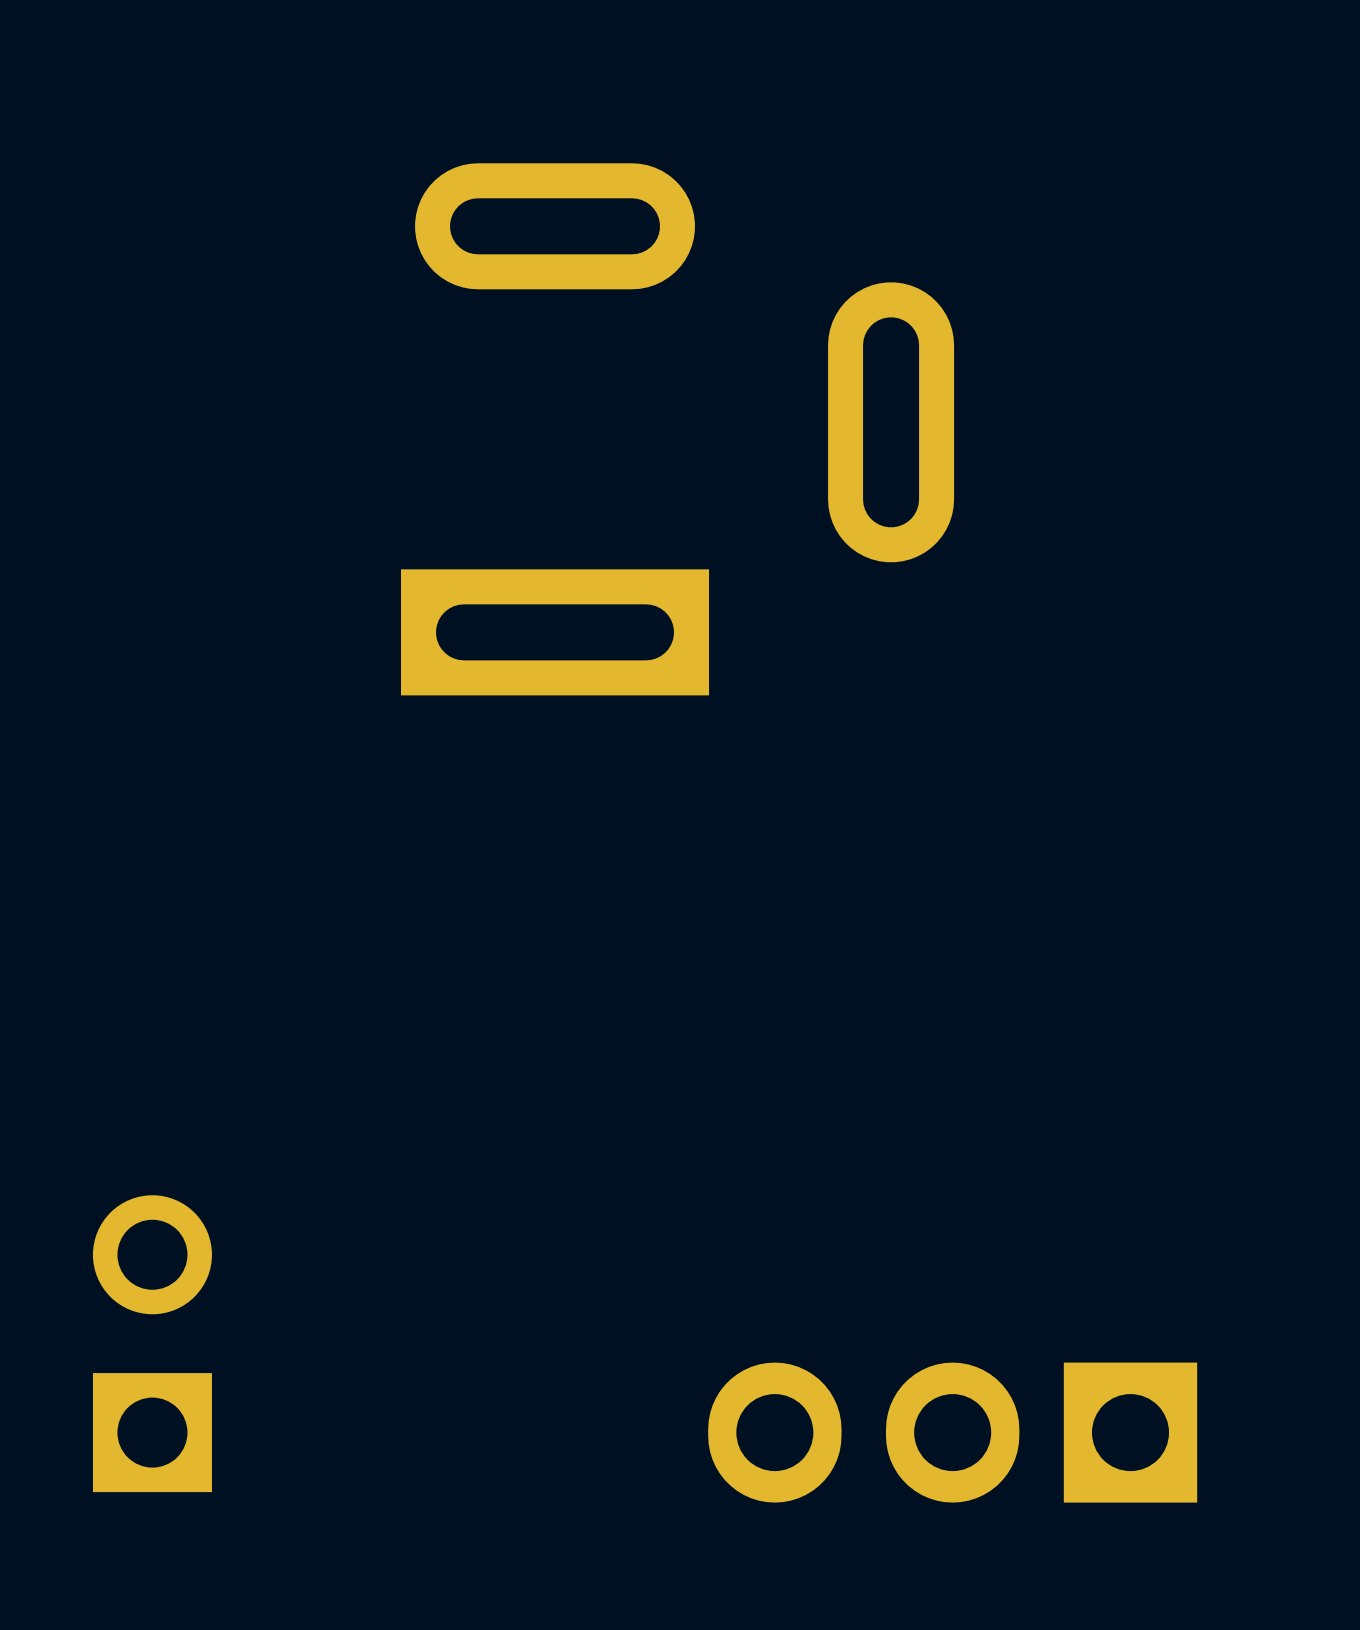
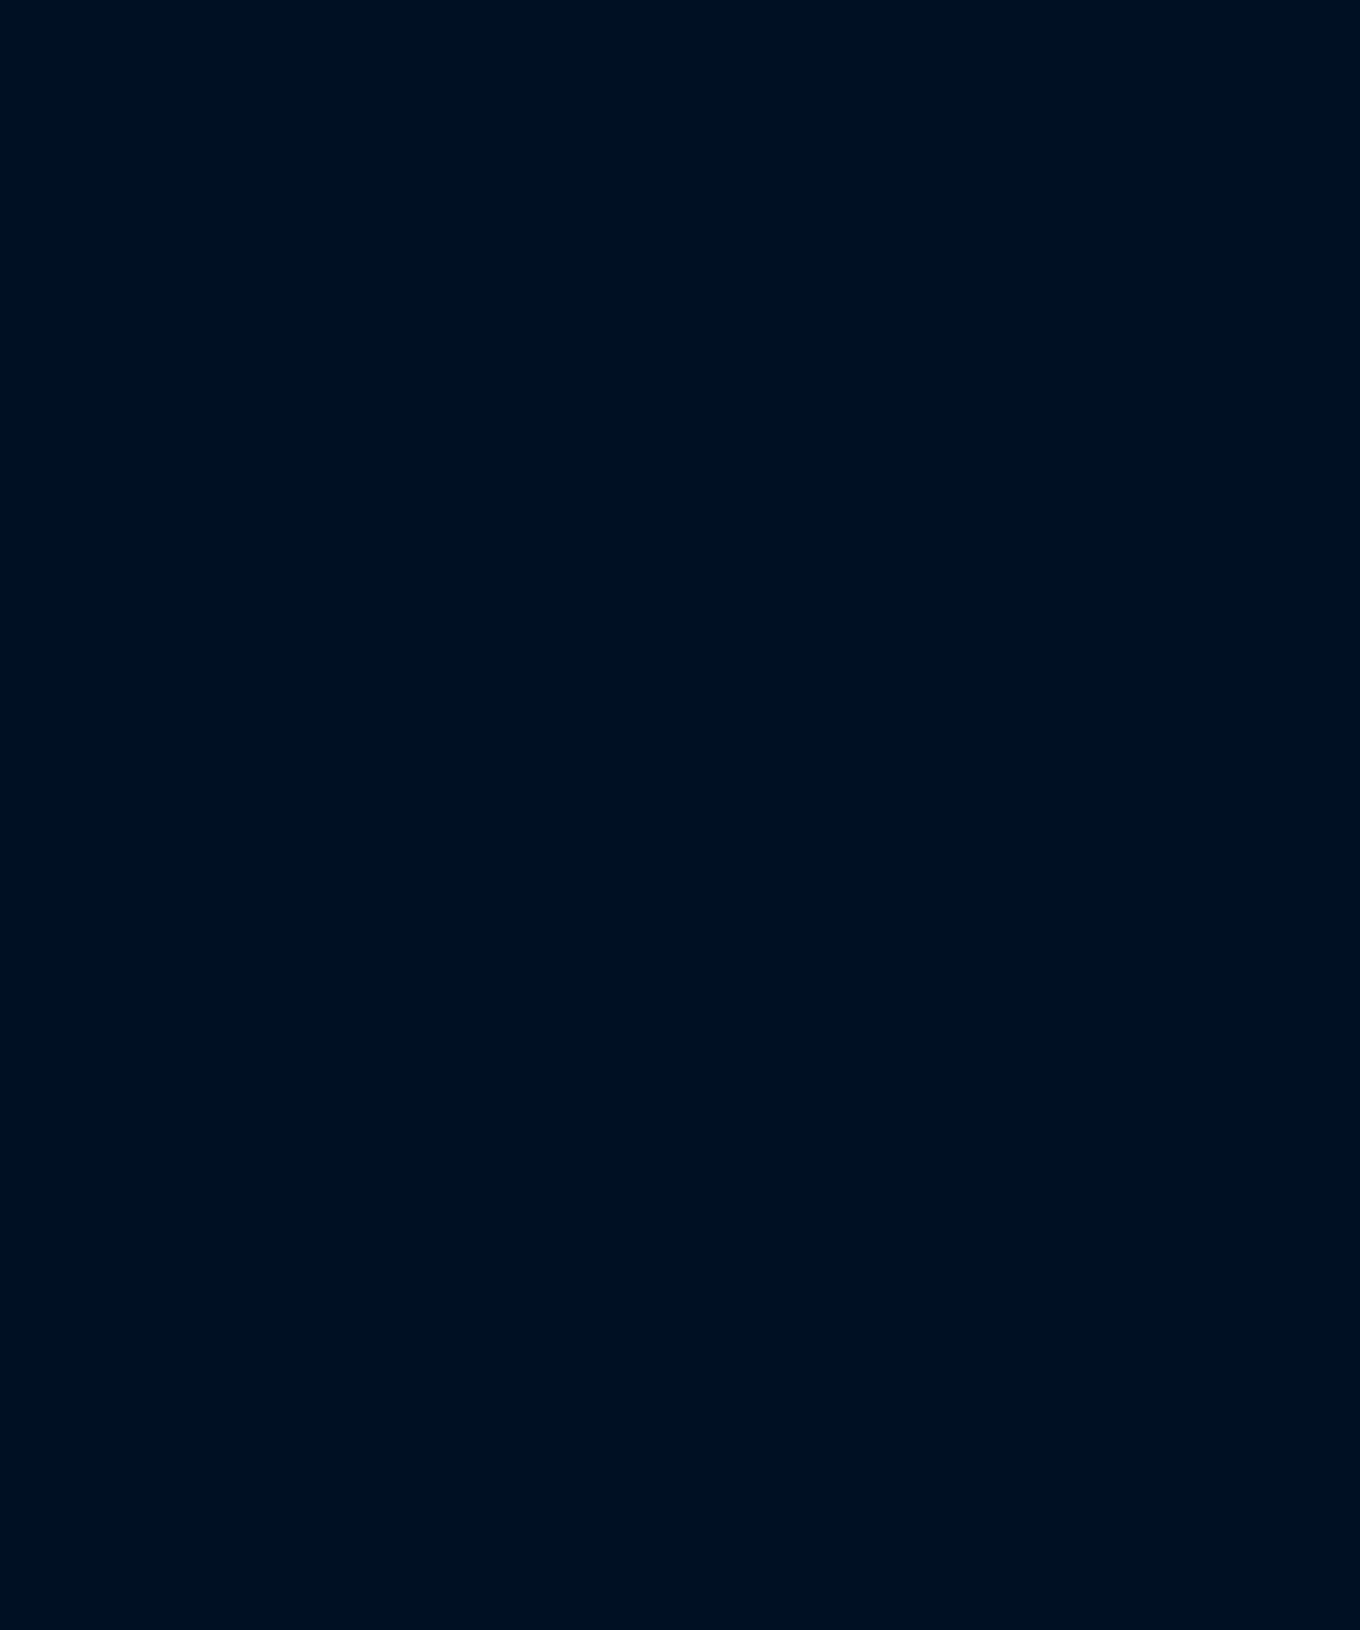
part: (677, 429) -> none
part: (152, 1343) -> none
part: (952, 1432) -> none

